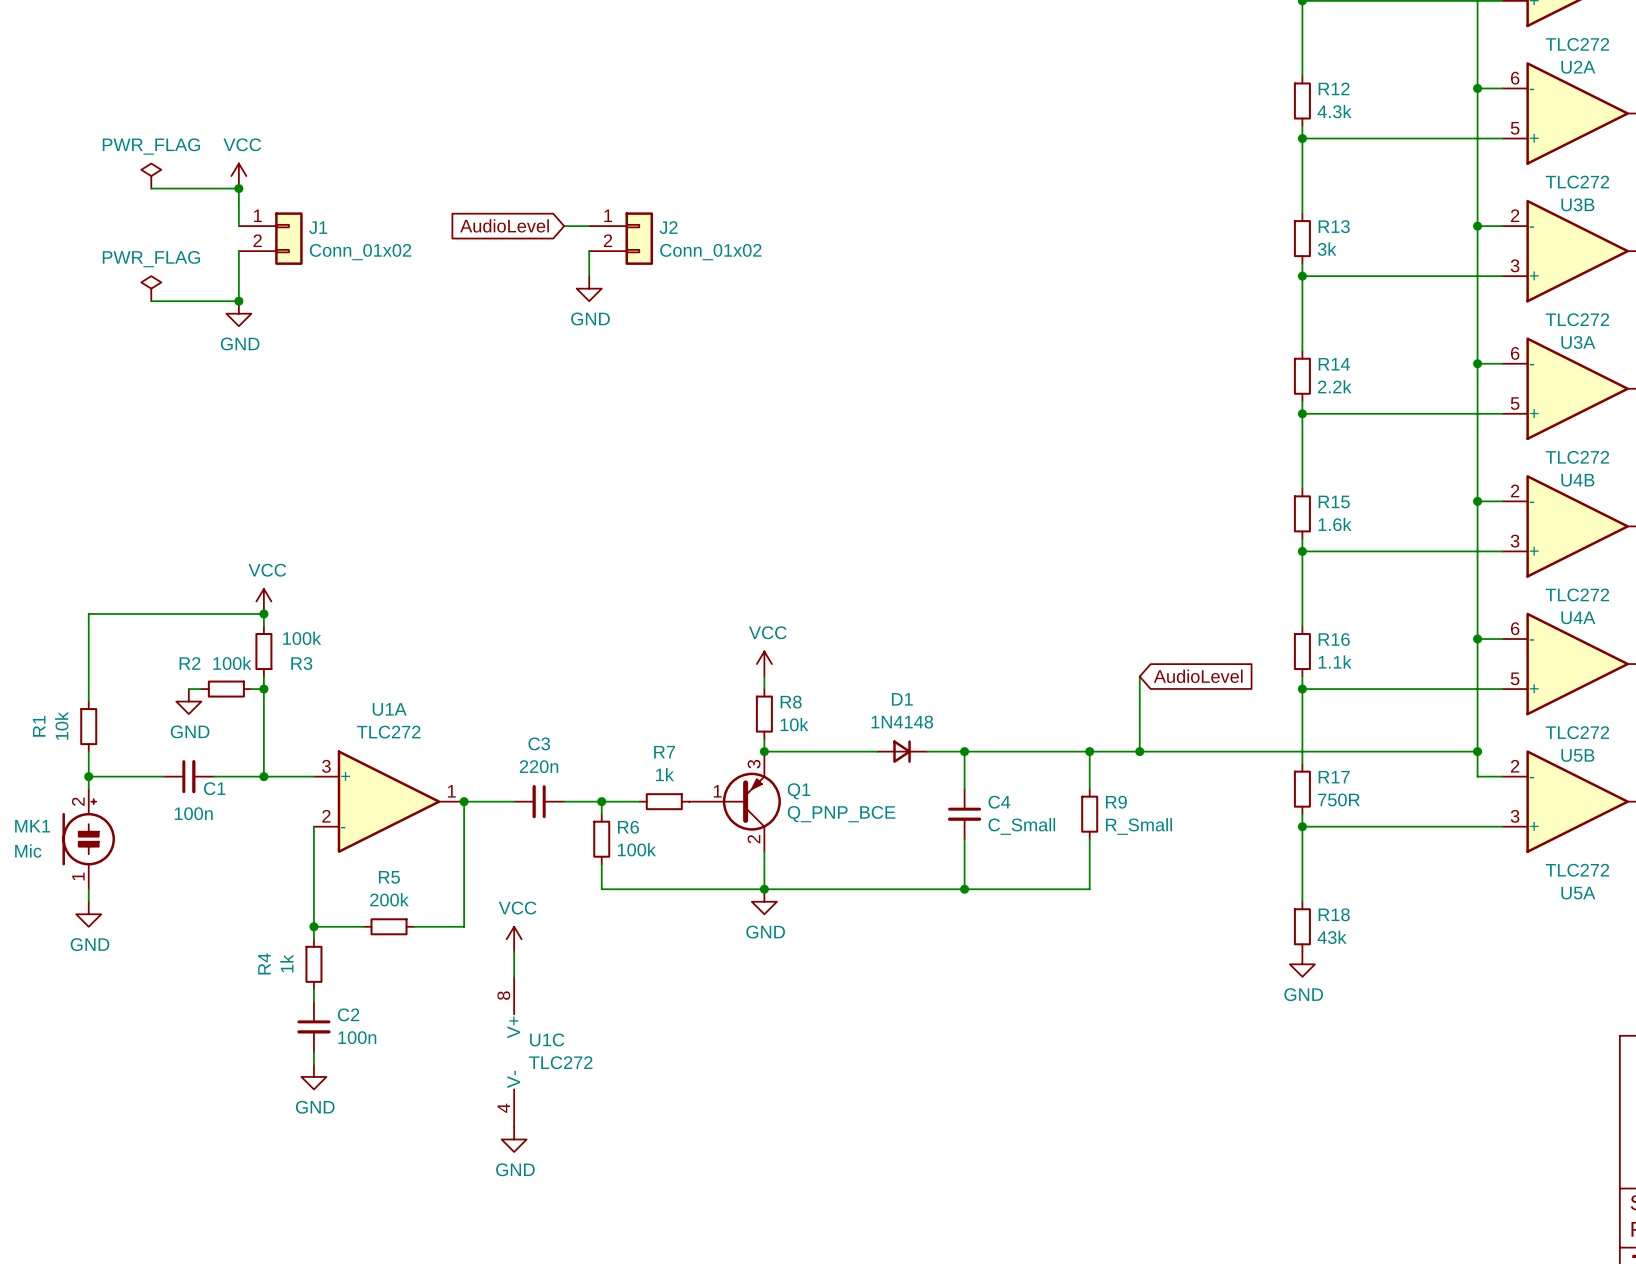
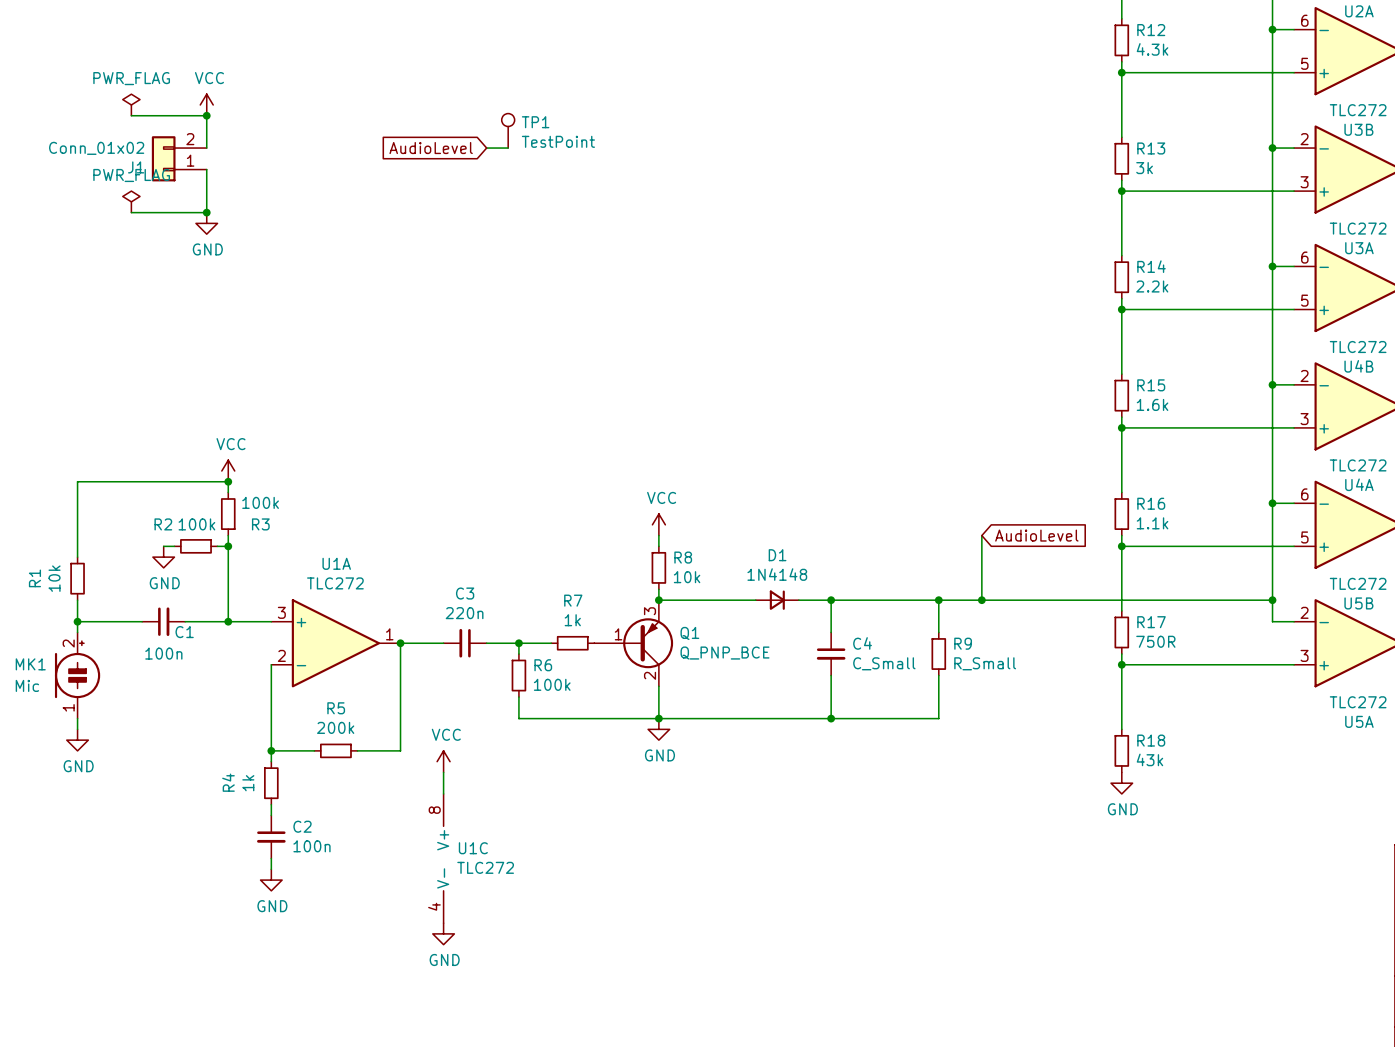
TP1: none -> TestPoint (508, 130)
J1 position: (270, 238) -> (179, 158)
J1 rotation: 0° (288, 238) -> 180° (163, 158)
J2: Conn_01x02 (621, 238) -> none
wire: (589, 251) (589, 276) -> none
power symbol: GND (589, 288) -> none

